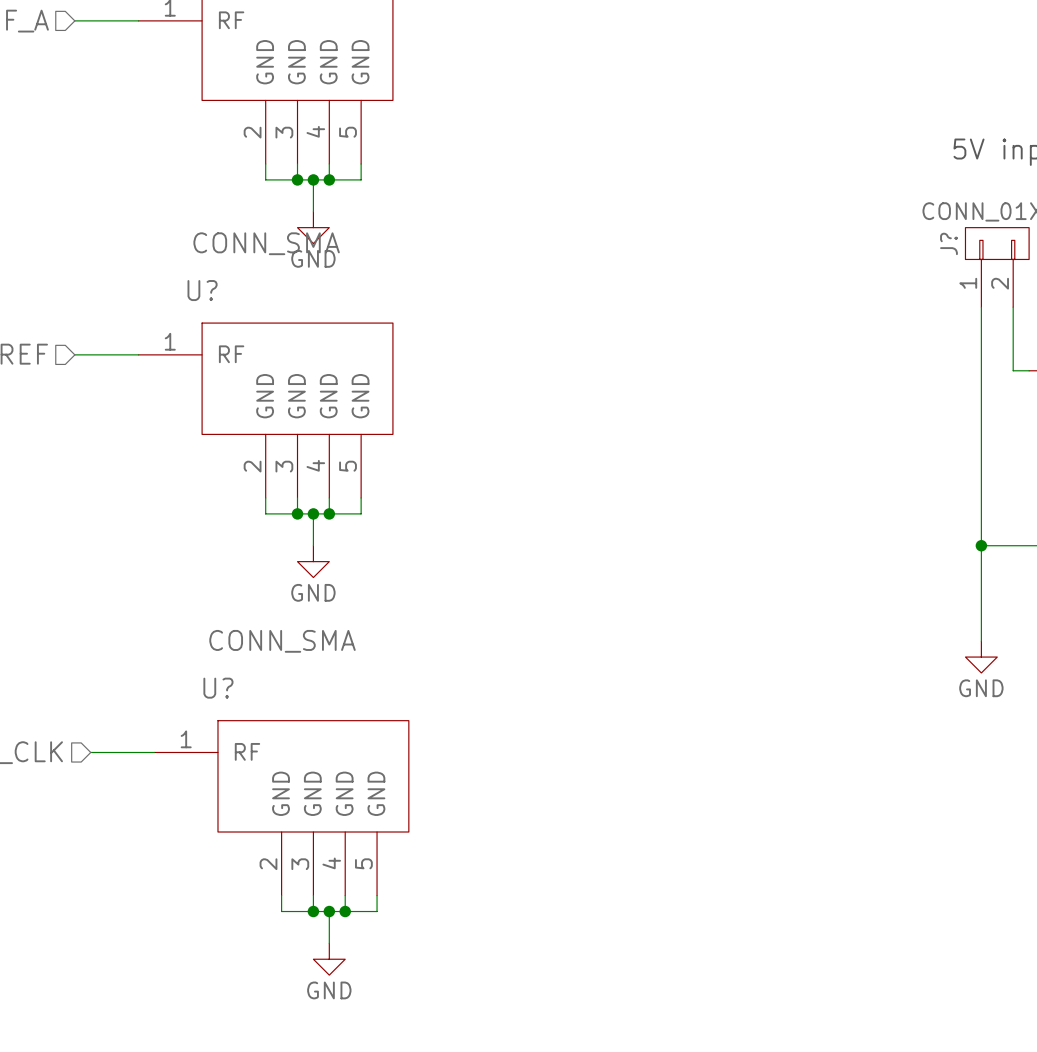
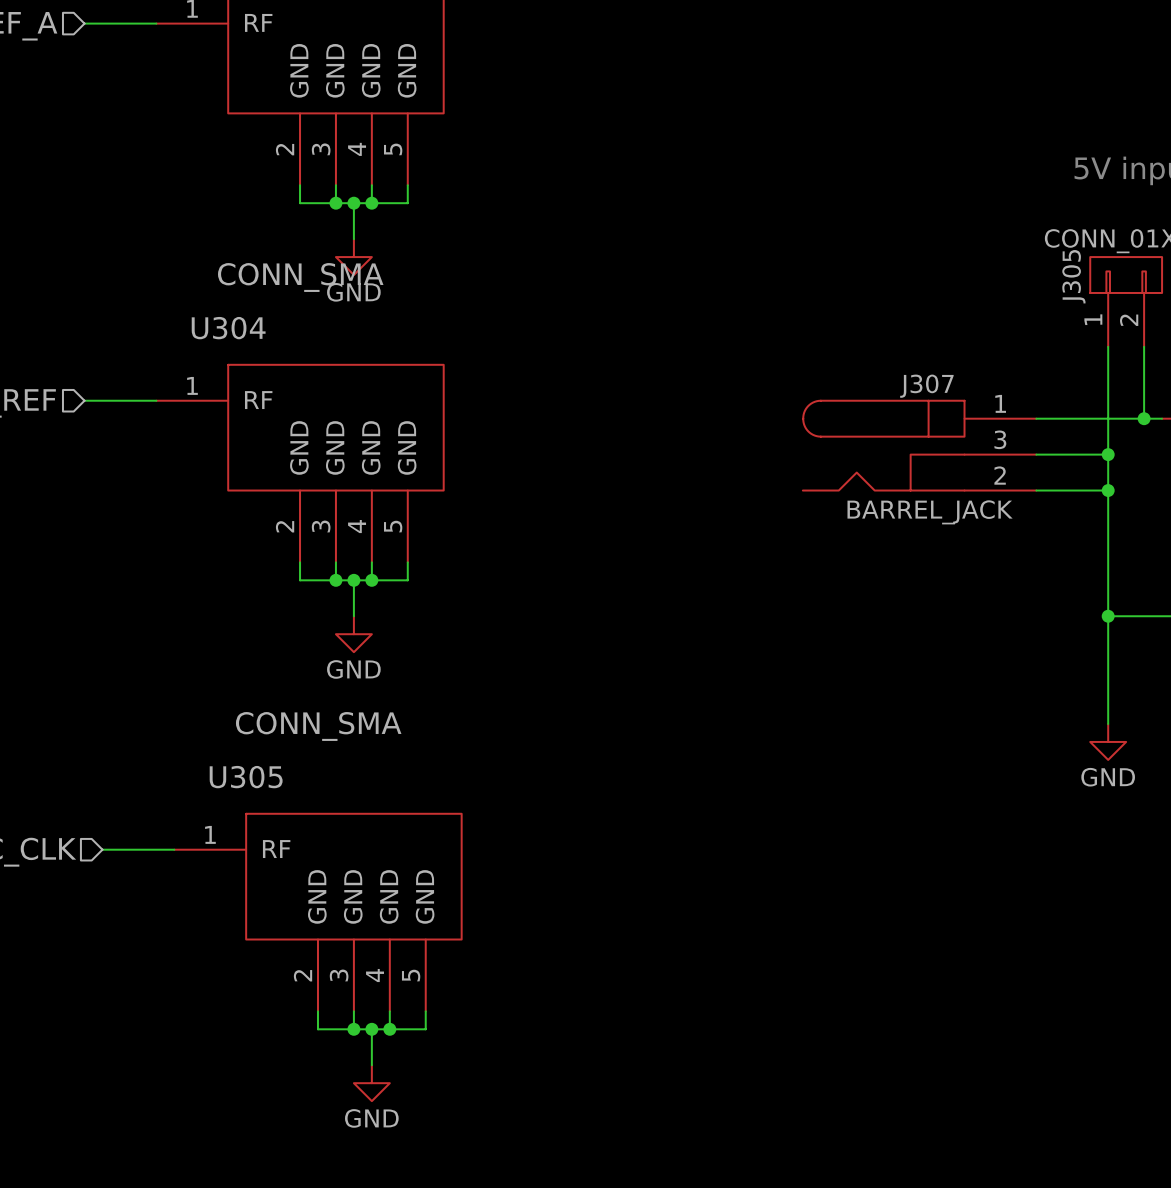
J? name: J? (948, 243) -> J305 (1073, 276)
U? name: U? (202, 290) -> U304 (228, 328)
wire: none -> (1036, 418) (1144, 418)
junction: none -> (1144, 418)
J307: none -> BARREL_JACK (919, 445)
wire: none -> (1036, 454) (1108, 454)
junction: none -> (1108, 454)
wire: none -> (1036, 490) (1108, 490)
junction: none -> (1108, 490)
U? name: U? (218, 688) -> U305 (246, 777)

